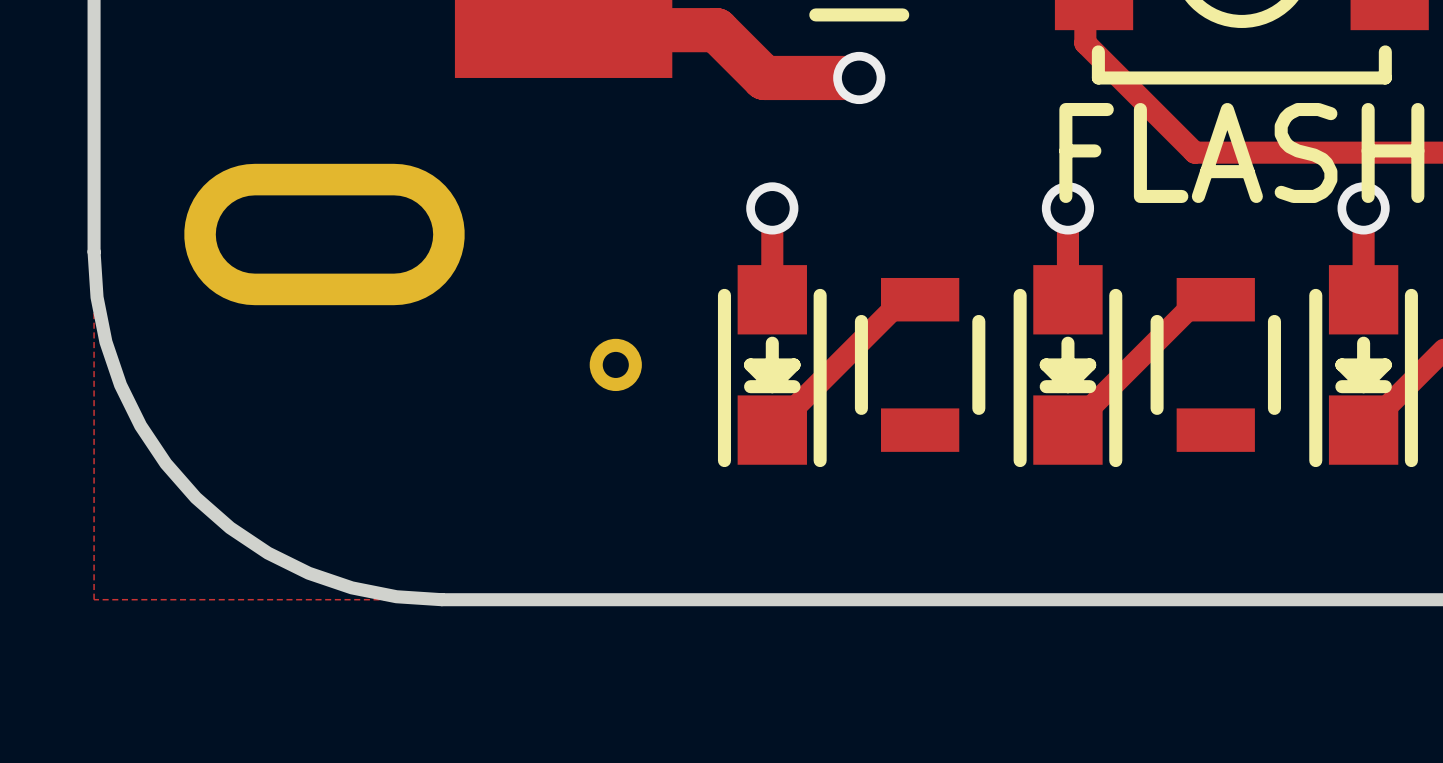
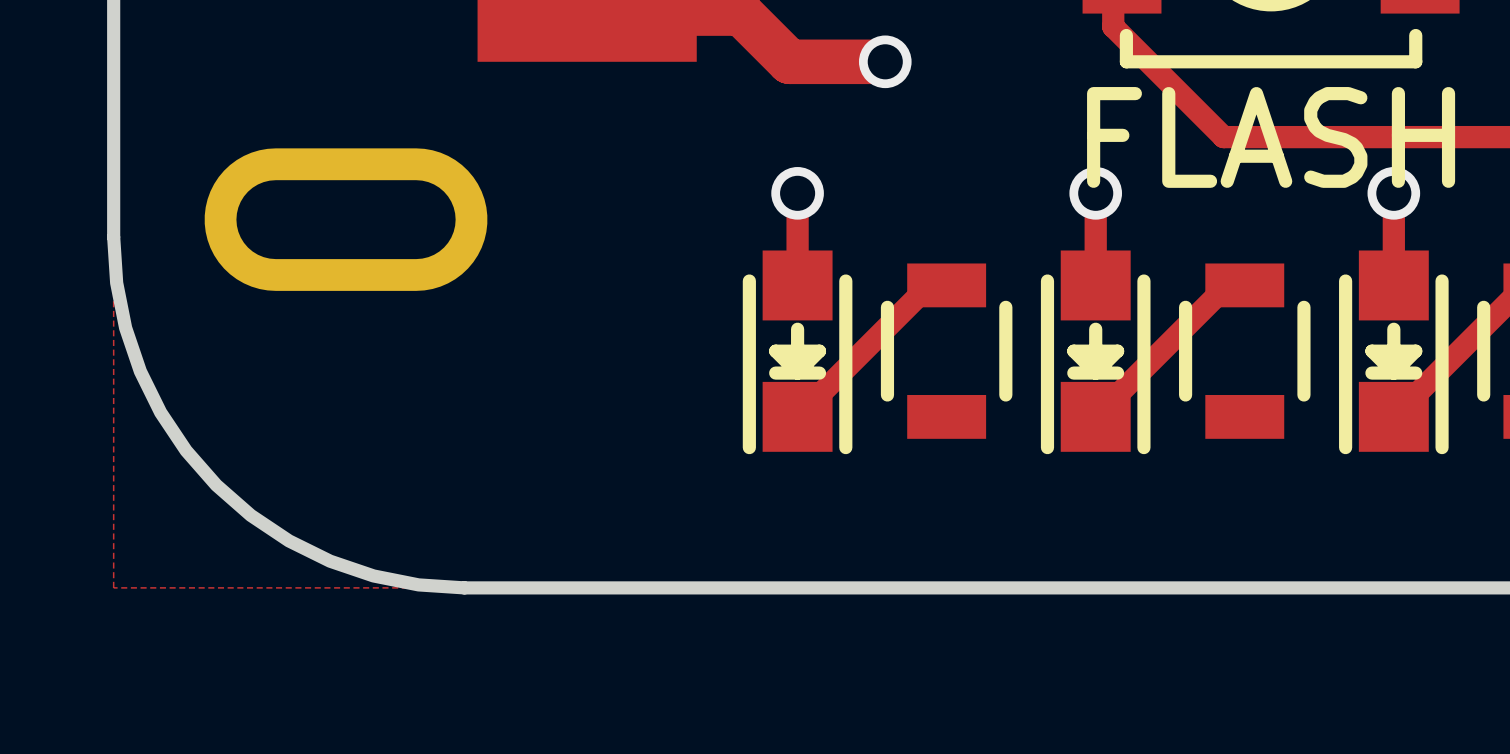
part: (615, 364) -> none

